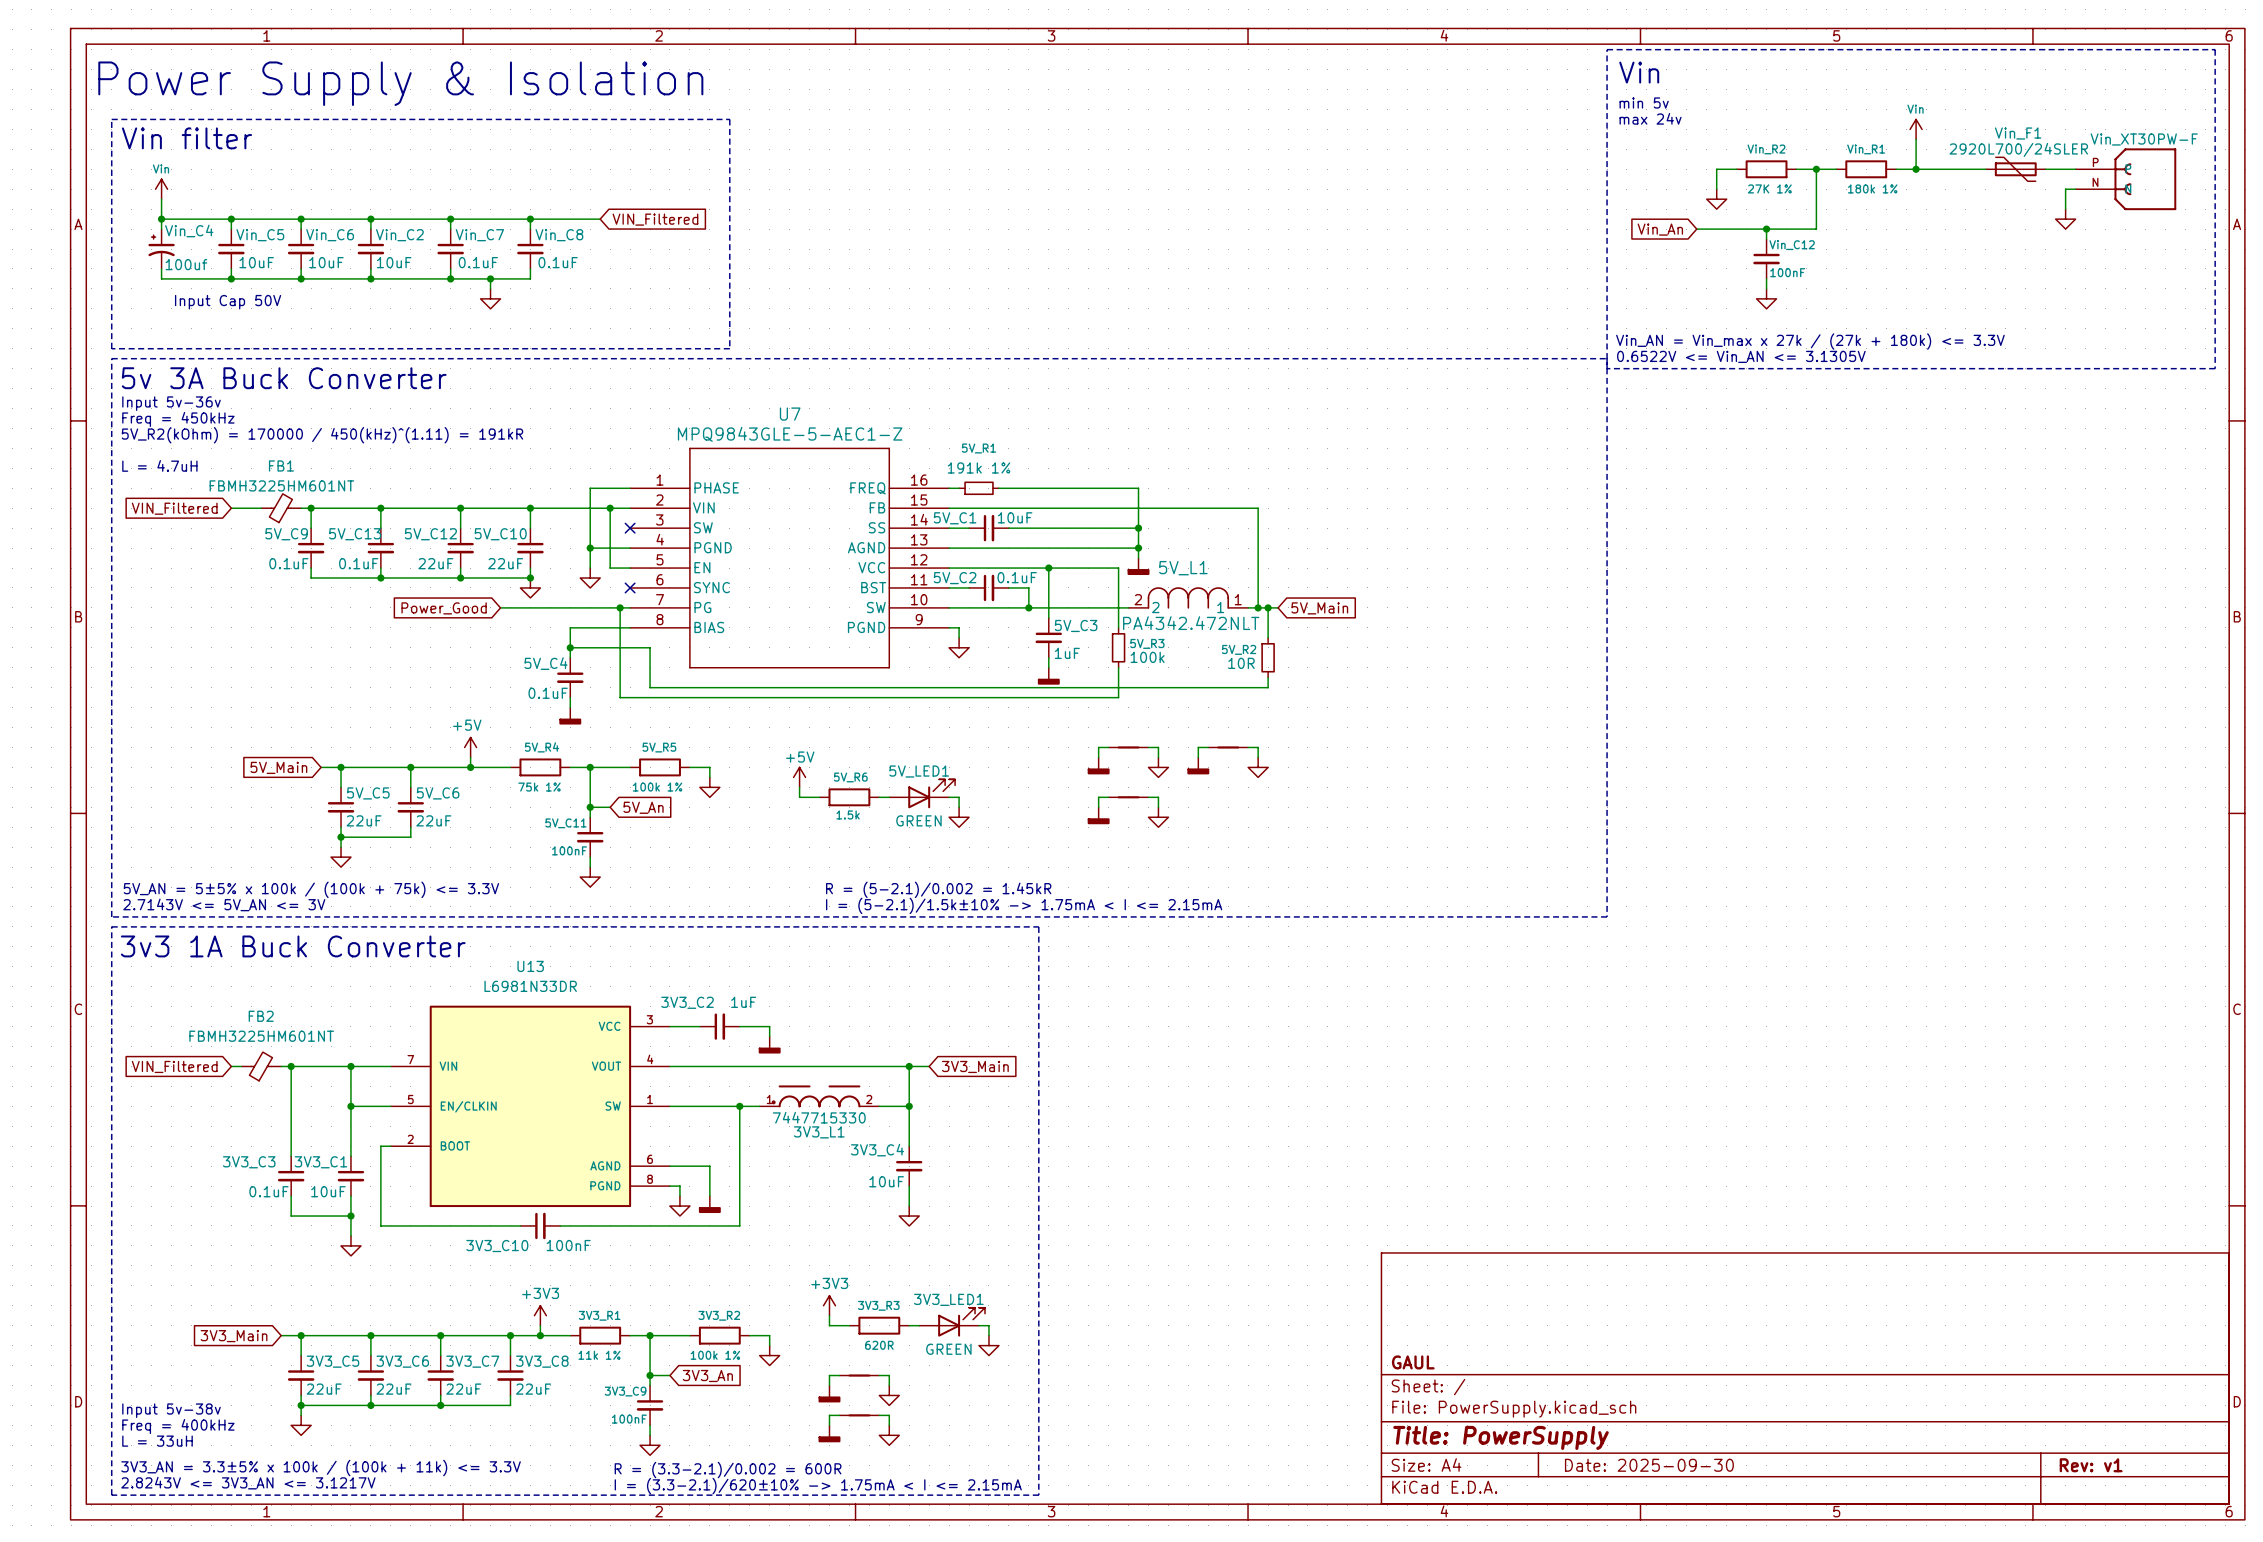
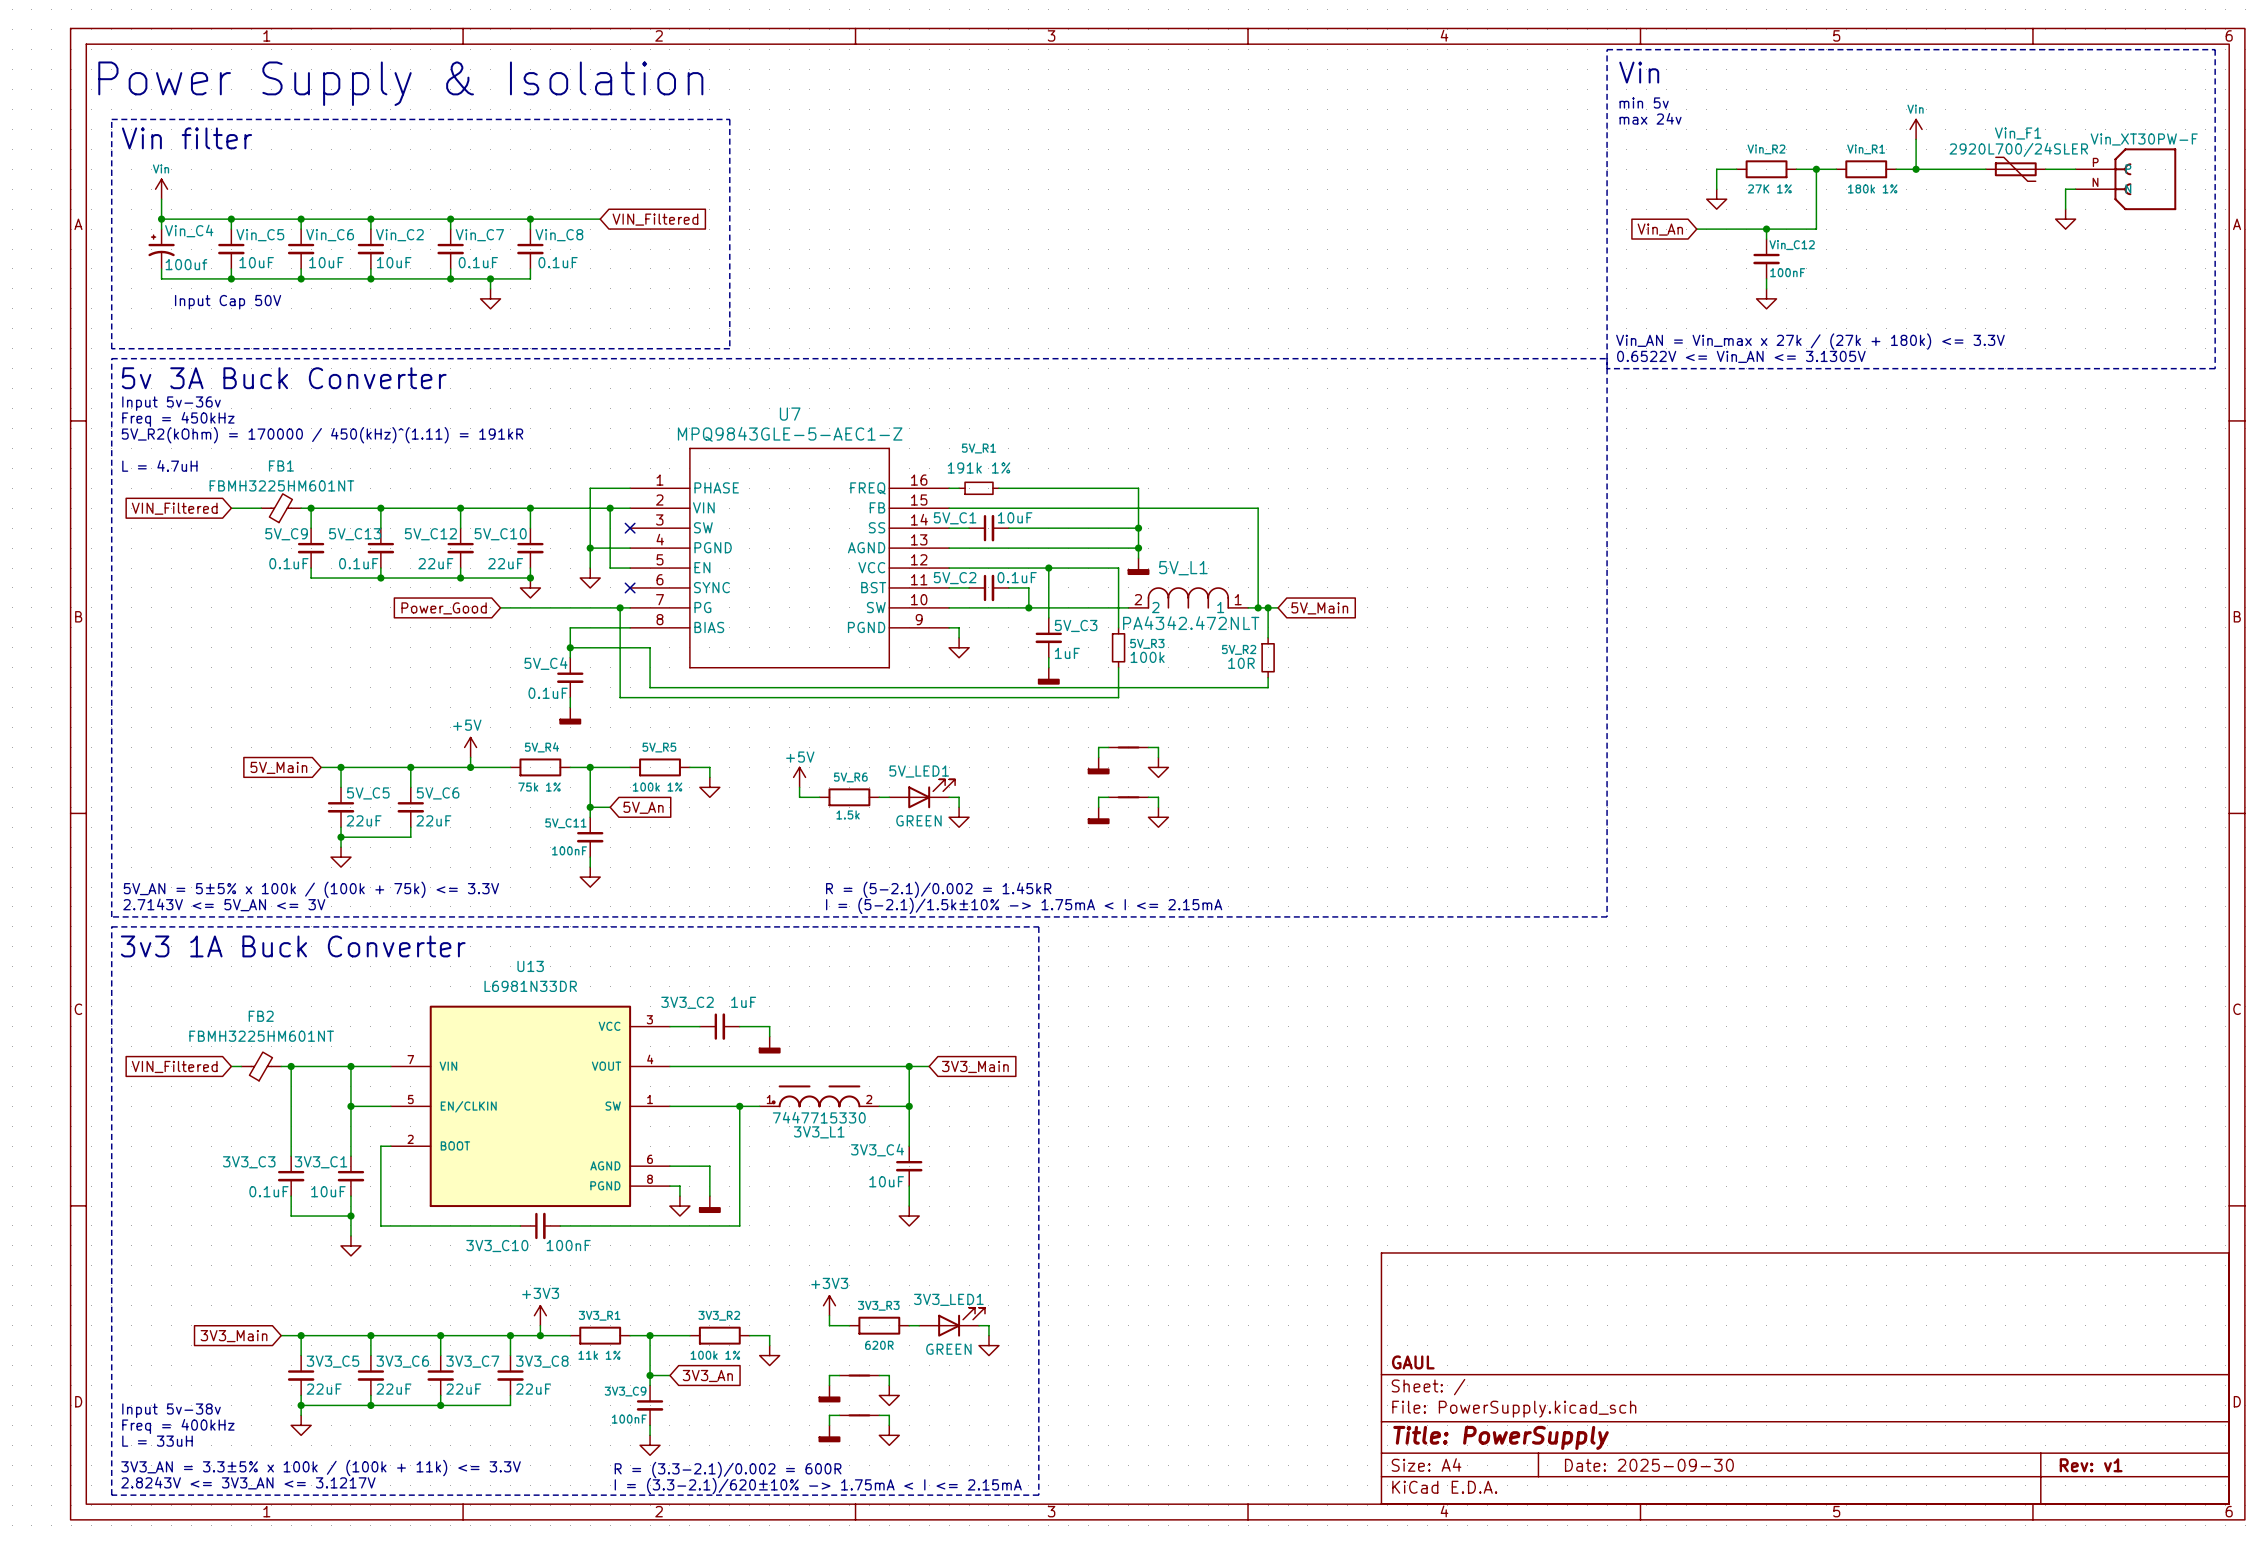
wire: (1208, 747) (1198, 747) (1198, 757) -> none
part: (1228, 747) -> none
wire: (1248, 747) (1258, 747) (1258, 757) -> none
power symbol: (1198, 765) -> none
power symbol: (1258, 767) -> none

